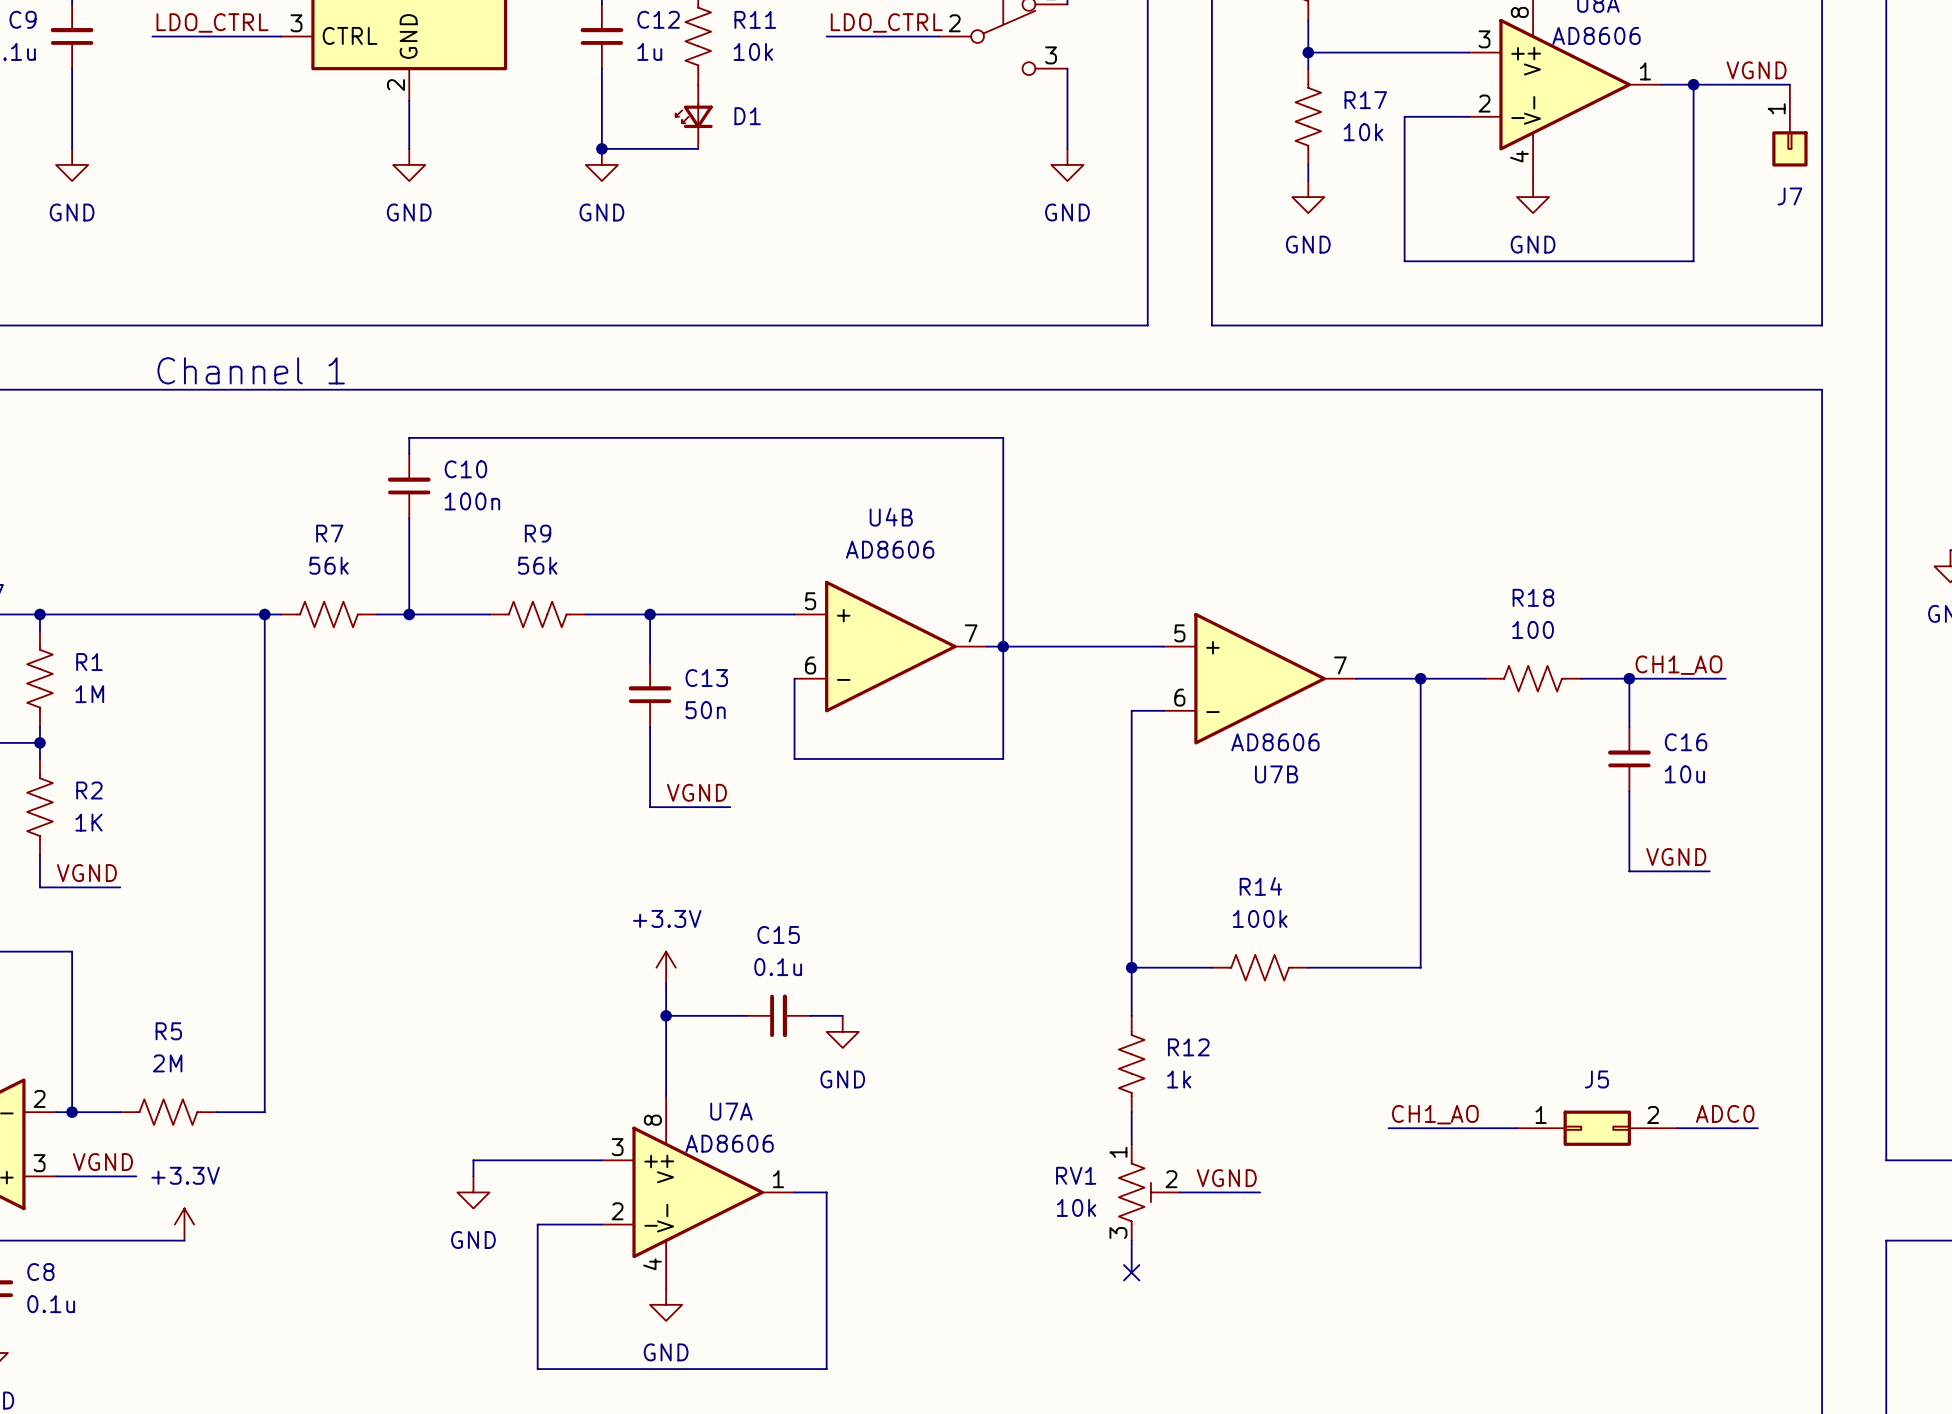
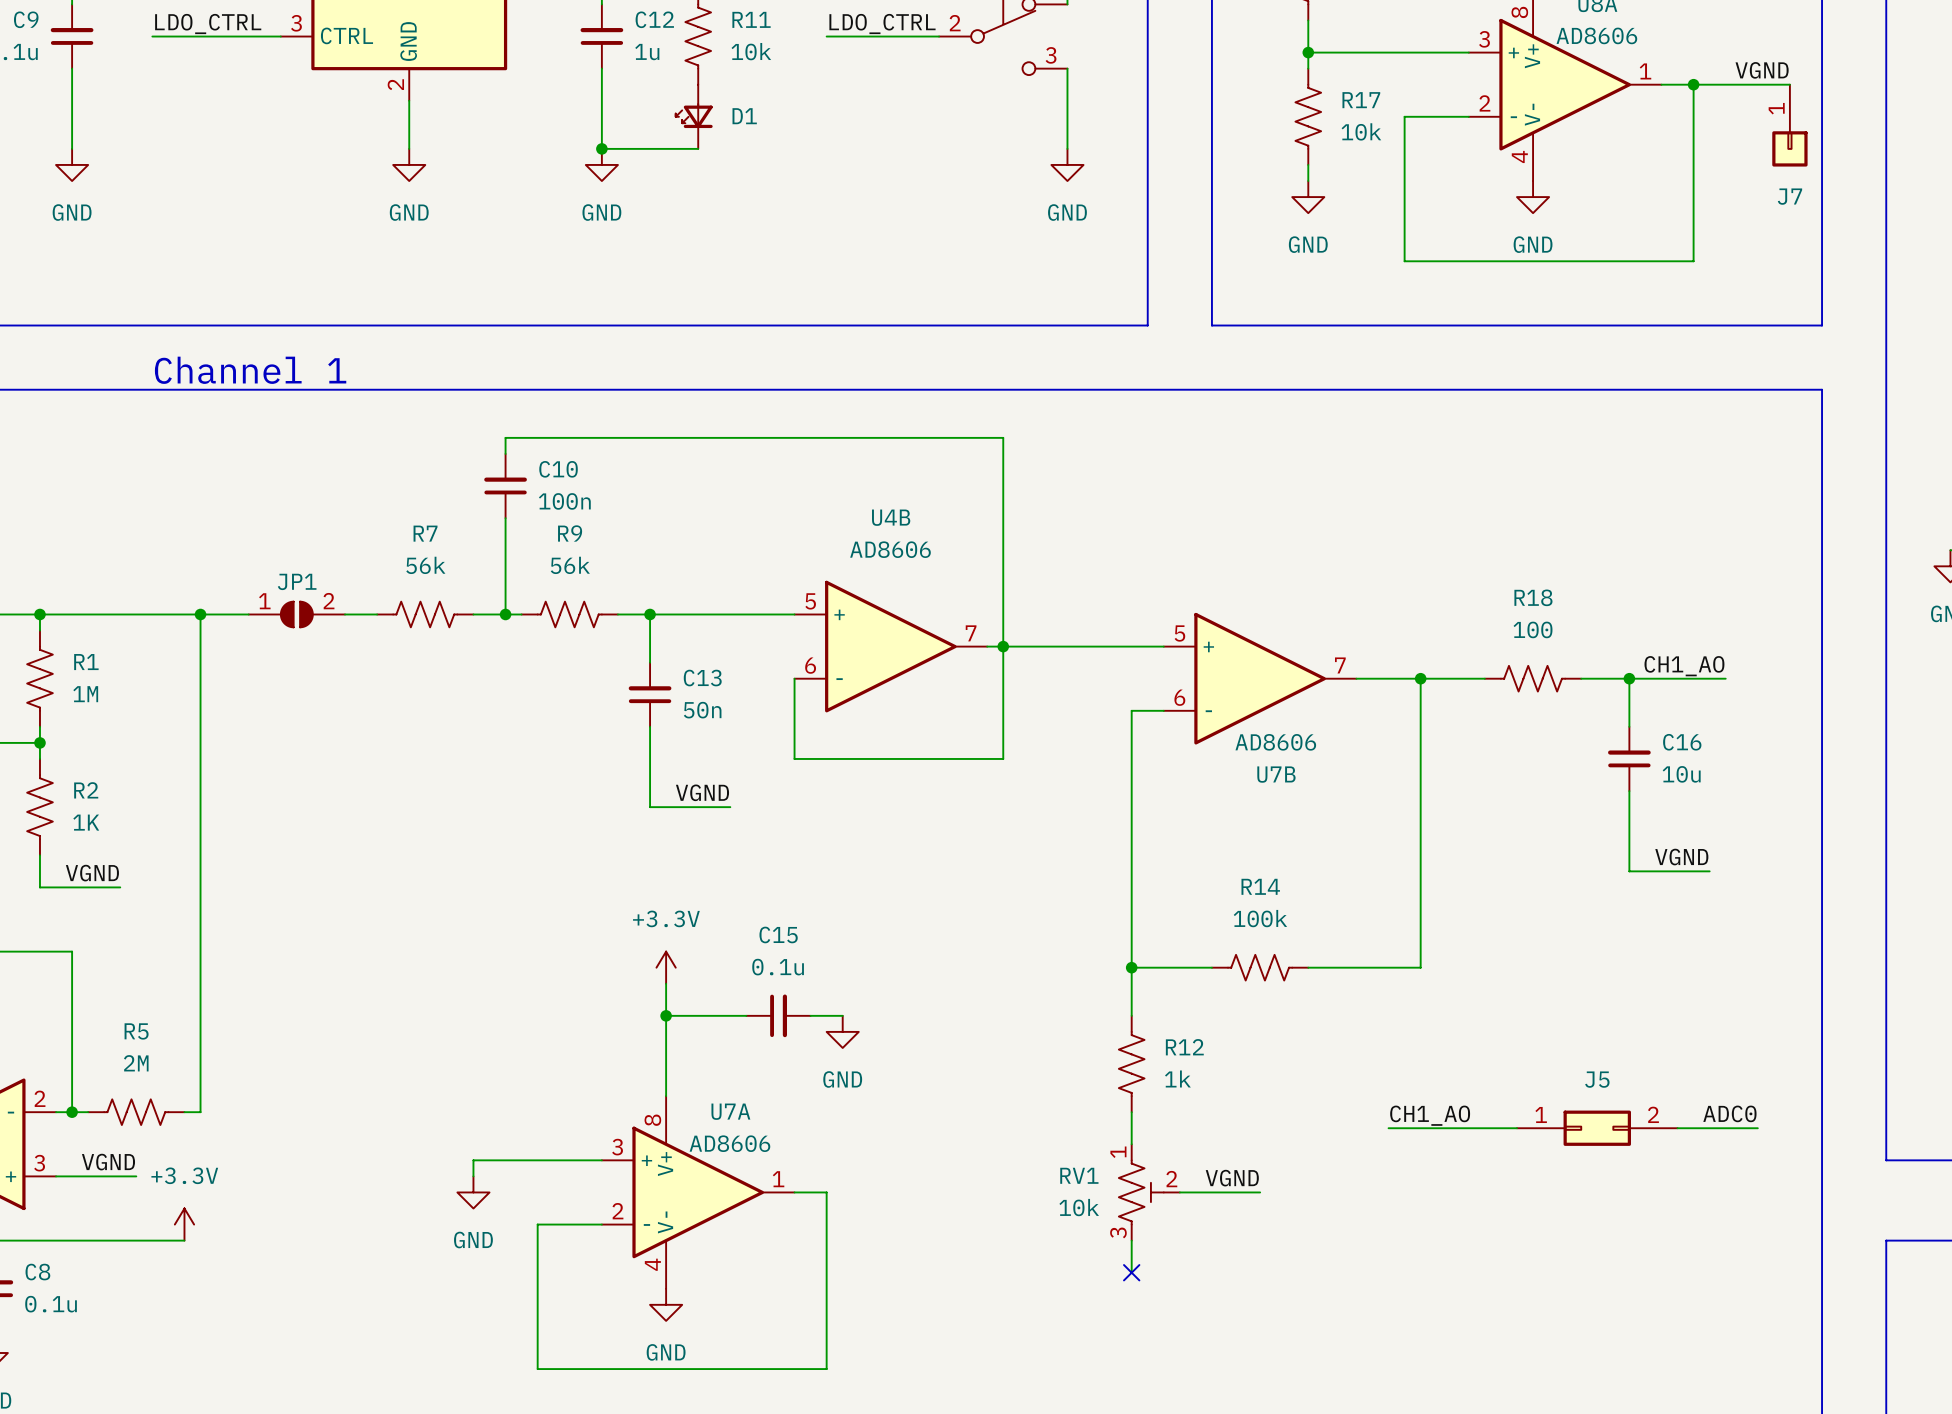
wire: (505, 437) (409, 437) (409, 453) -> (505, 437) (505, 453)
C10 position: (409, 486) -> (505, 486)
wire: (409, 518) (409, 614) -> (505, 518) (505, 614)
wire: none -> (200, 614) (200, 1112) (184, 1112)
wire: (264, 614) (264, 1112) (216, 1112) -> none
junction position: (264, 614) -> (200, 614)
JP1: none -> (296, 614)
R7 position: (328, 614) -> (425, 614)
junction: (409, 614) -> none
junction: none -> (505, 614)
R9 position: (537, 614) -> (569, 614)
R5 position: (168, 1112) -> (136, 1112)

